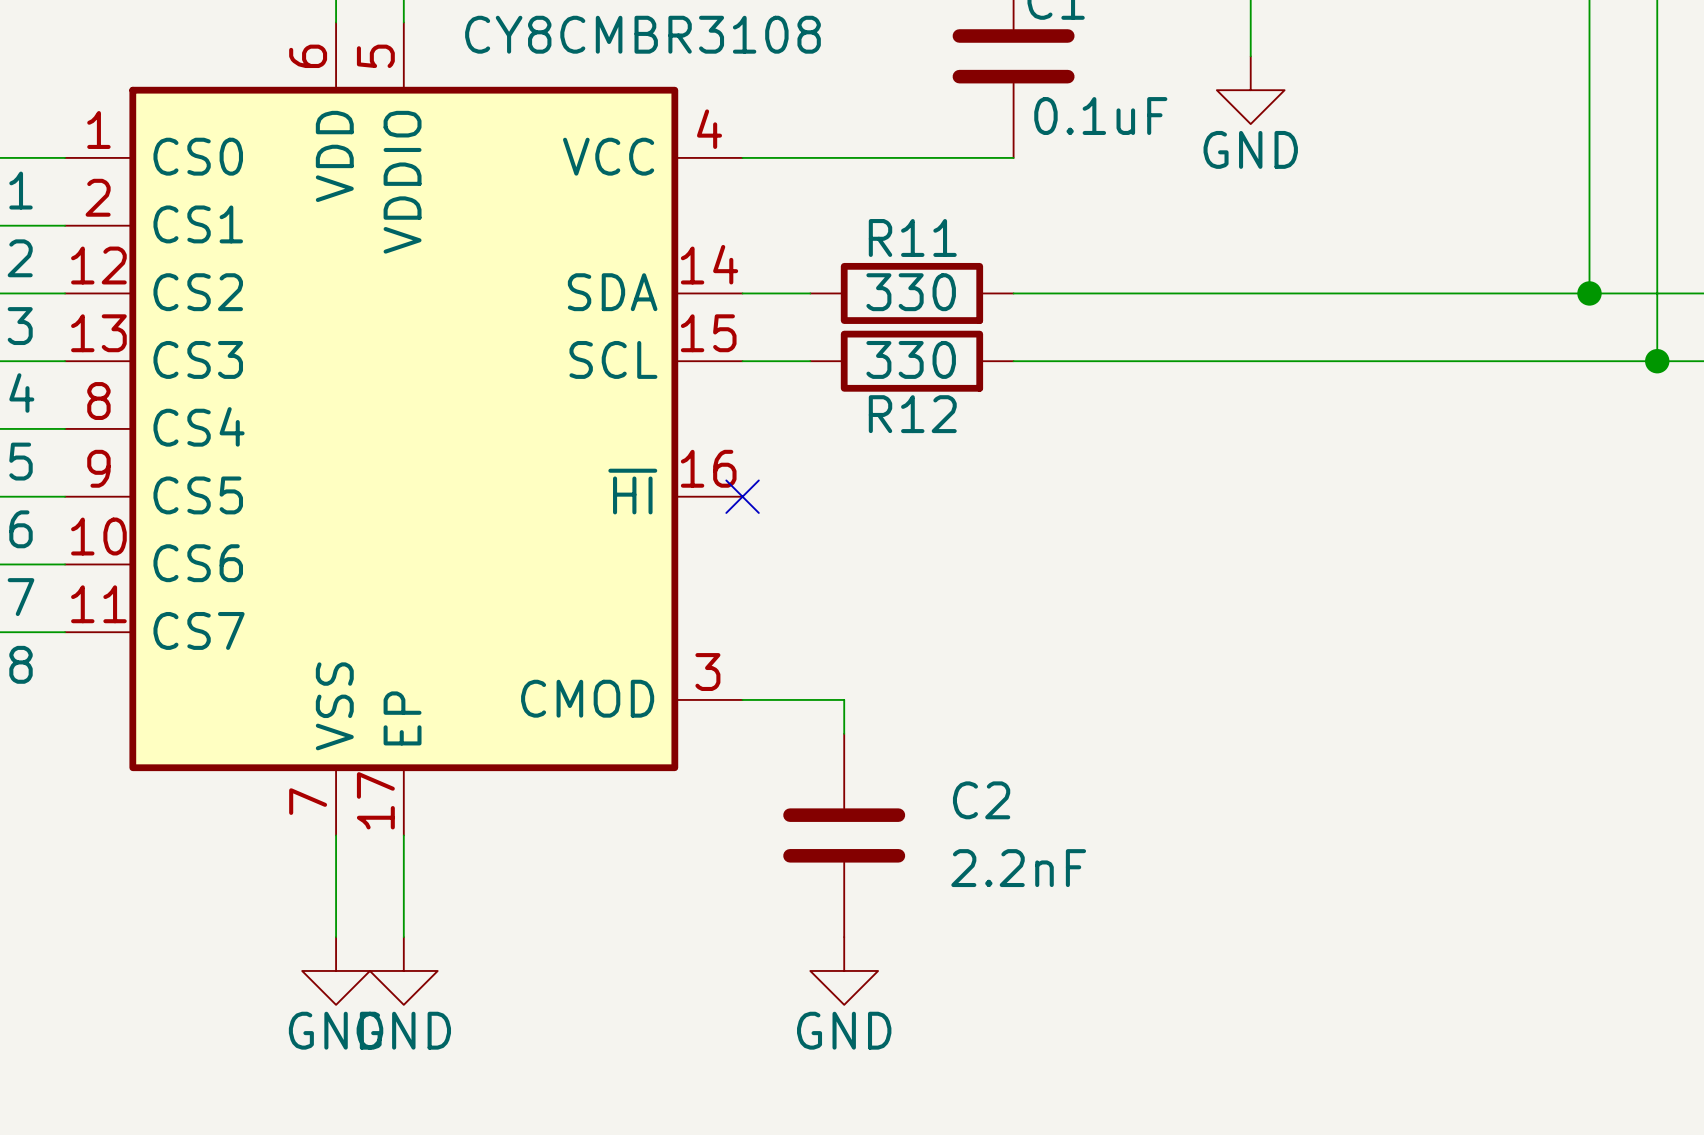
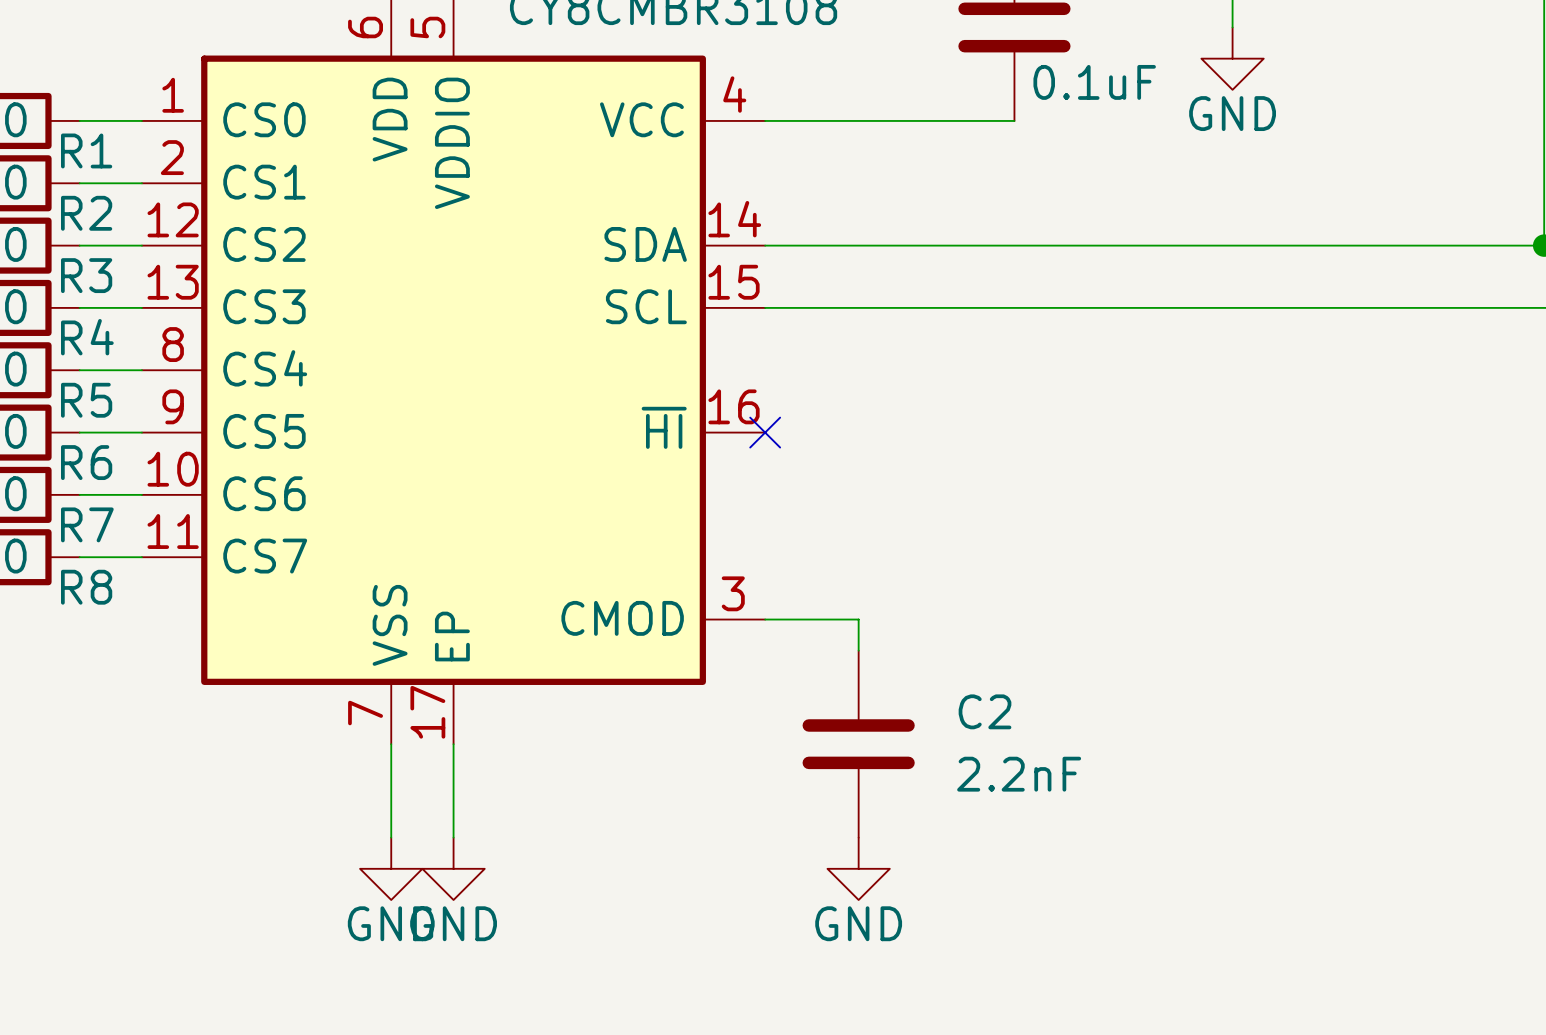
wire: none -> (827, 245) (1014, 245)
R11: 330 (911, 293) -> none
wire: none -> (827, 307) (1014, 307)
R12: 330 (911, 361) -> none

